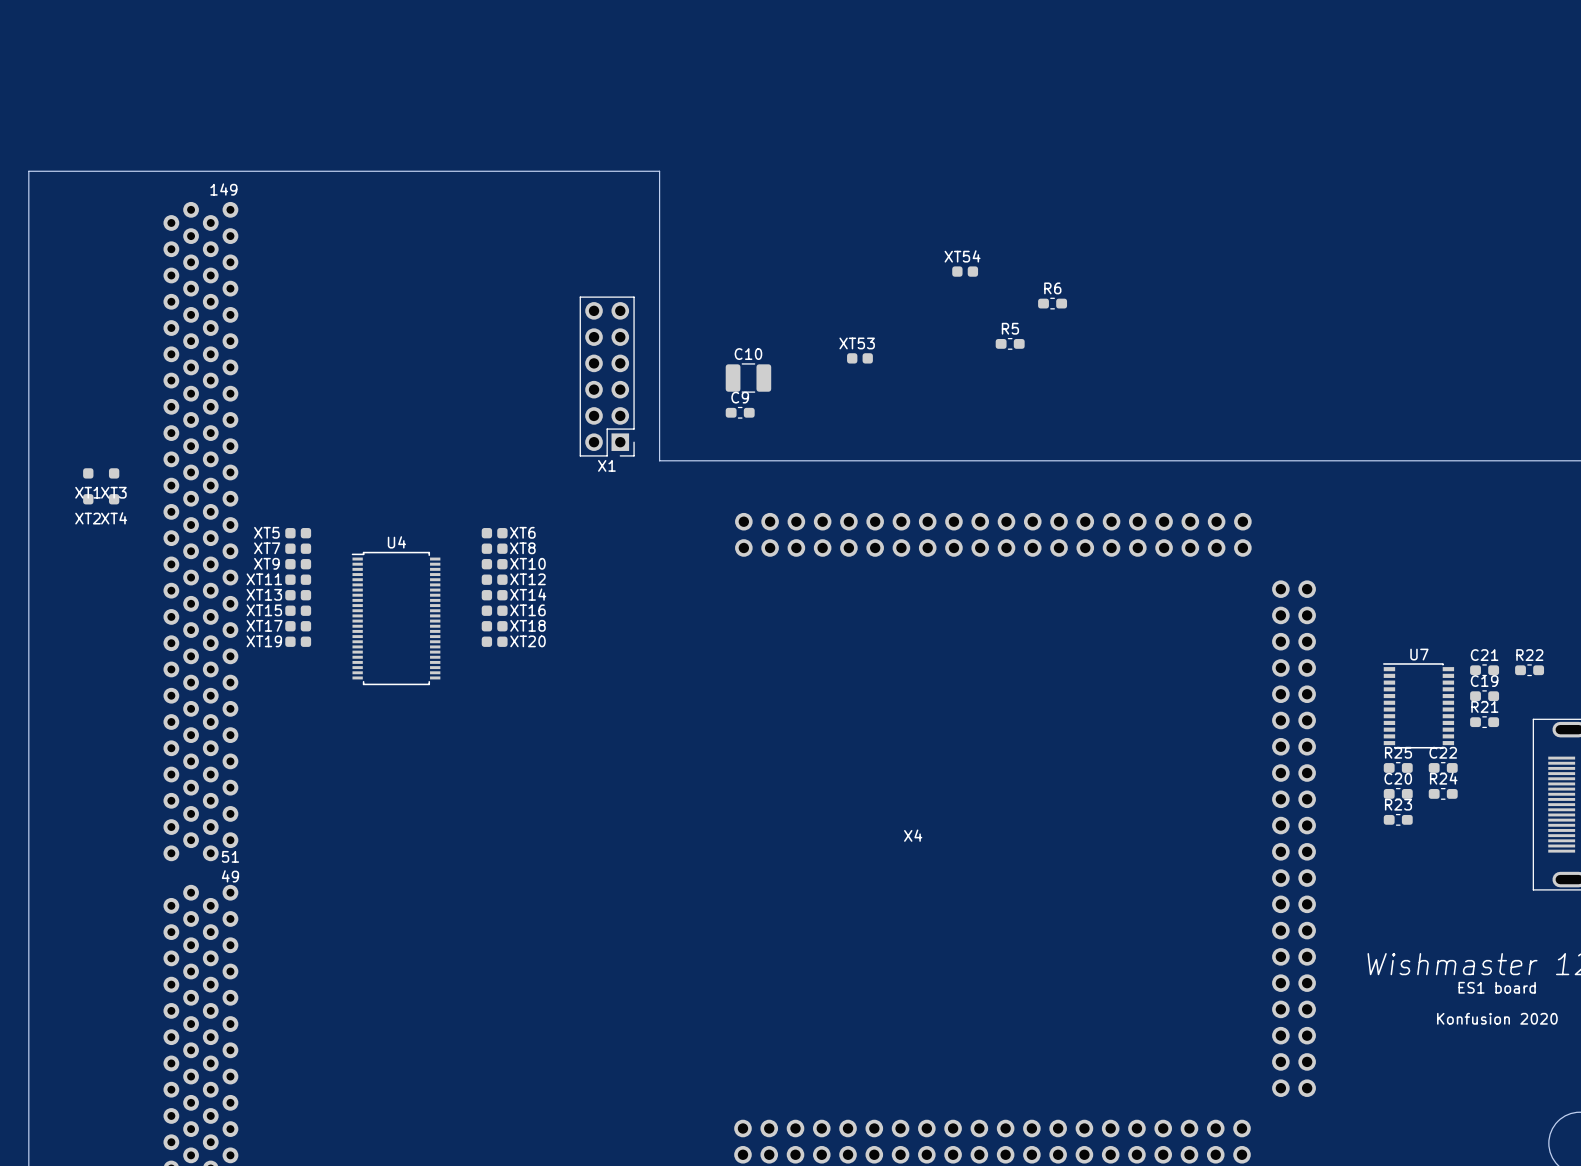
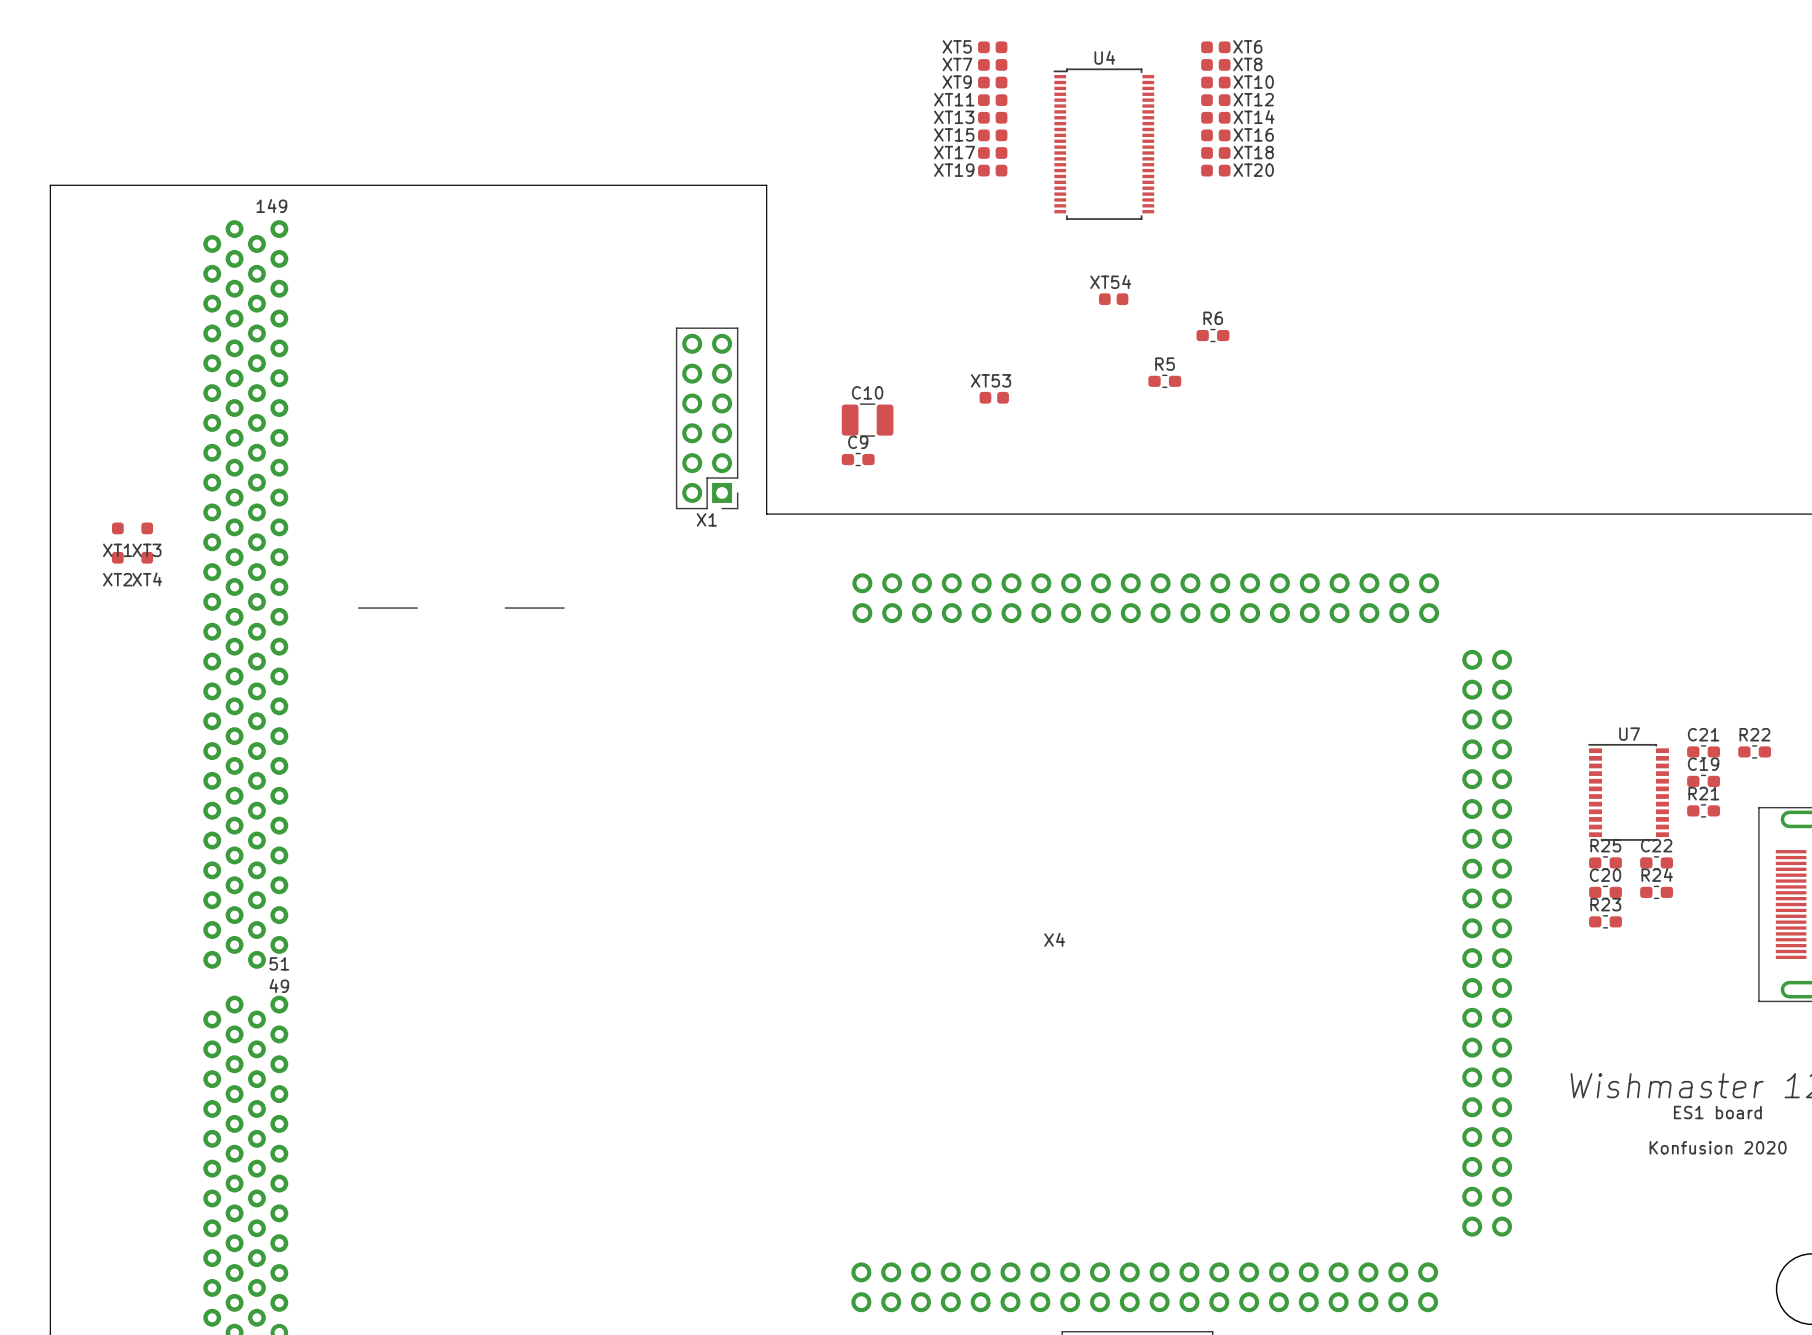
XT5 position: (298, 533) -> (992, 47)
XT6 position: (494, 533) -> (1215, 47)
line: none -> (358, 608) (417, 608)
line: none -> (505, 608) (564, 608)
XT7 position: (298, 548) -> (992, 64)
XT8 position: (494, 548) -> (1215, 64)
XT9 position: (298, 564) -> (992, 82)
XT10 position: (494, 564) -> (1215, 82)
XT11 position: (298, 579) -> (992, 100)
XT12 position: (494, 579) -> (1215, 100)
XT13 position: (298, 595) -> (992, 117)
XT14 position: (494, 595) -> (1215, 117)
XT15 position: (298, 610) -> (992, 135)
XT16 position: (494, 610) -> (1215, 135)
U4 position: (396, 618) -> (1103, 144)
XT17 position: (298, 626) -> (992, 152)
XT18 position: (494, 626) -> (1215, 152)
XT19 position: (298, 641) -> (992, 170)
XT20 position: (494, 641) -> (1215, 170)

